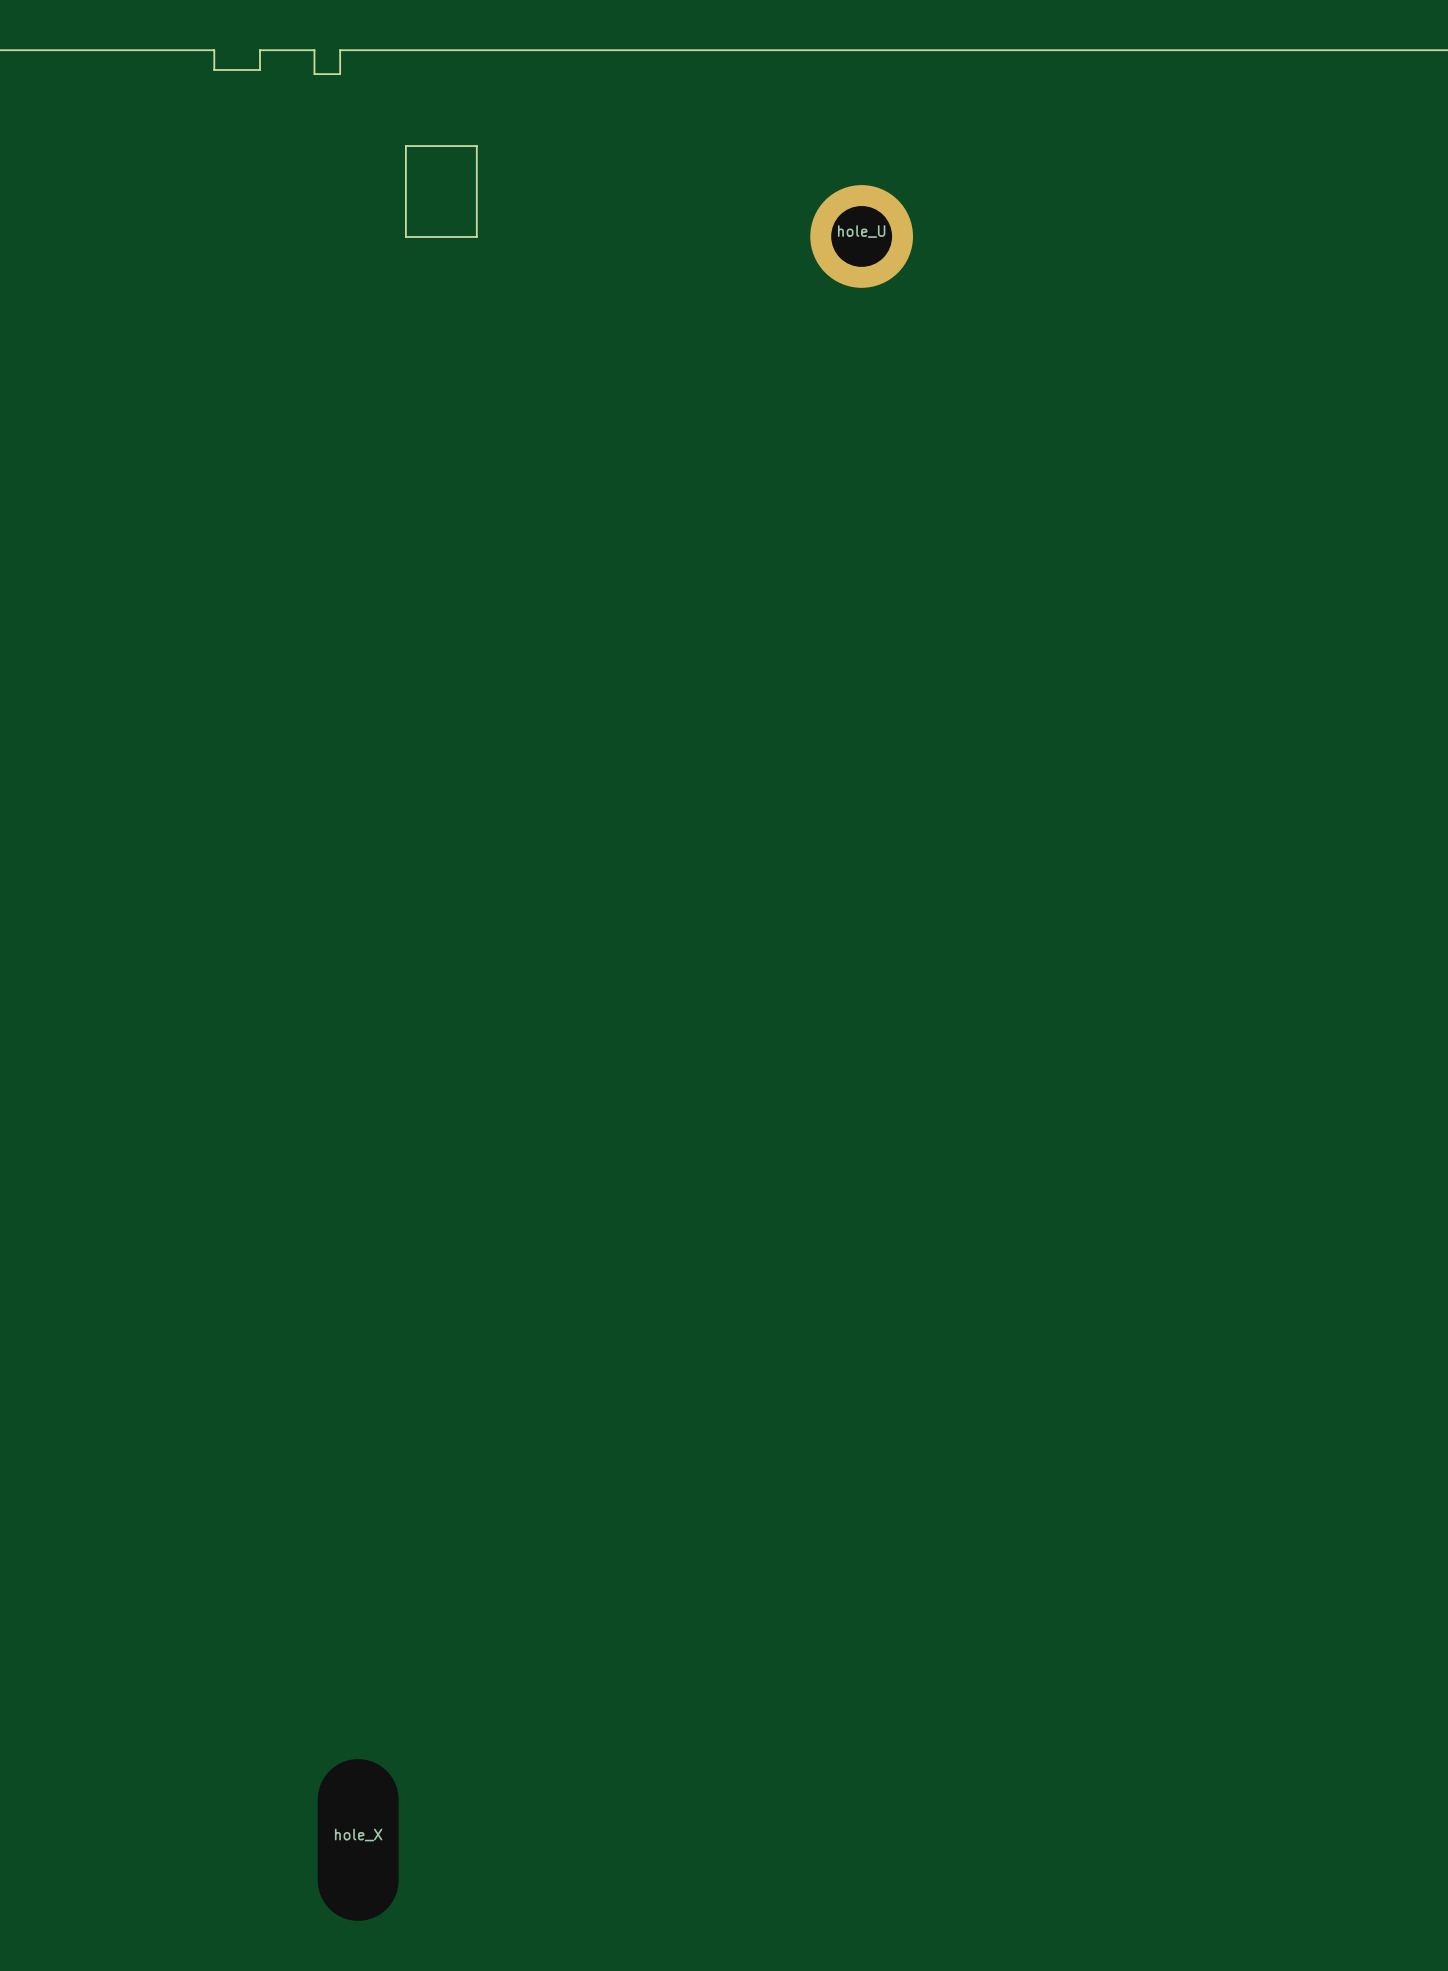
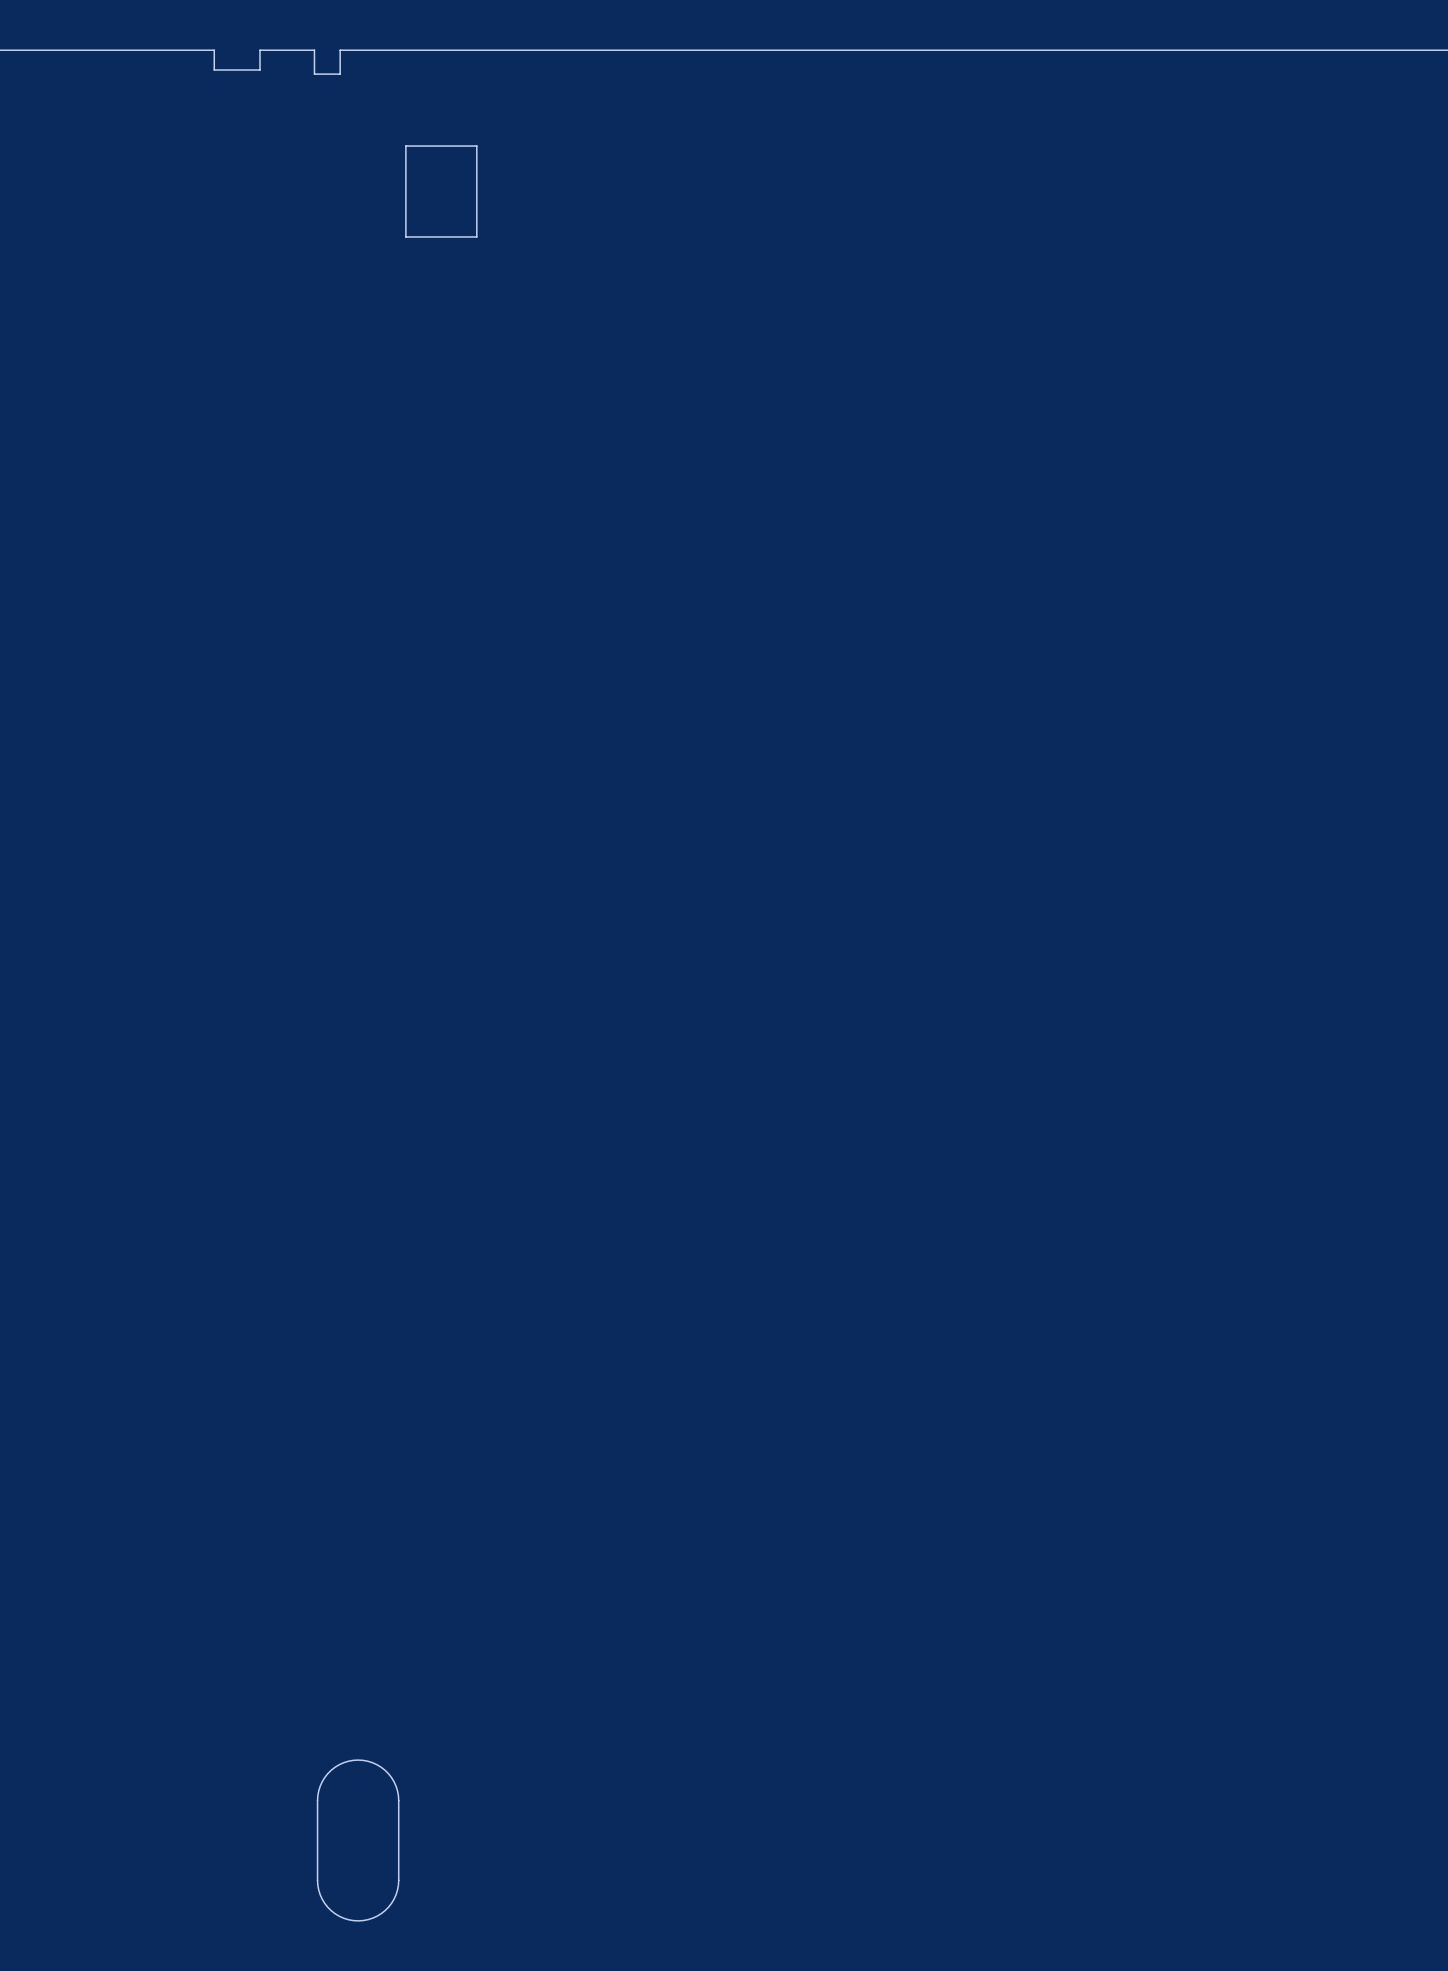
part: hole_U (861, 236) -> none
board edge: none -> (317, 1800) (317, 1880) (322, 1899) (331, 1910) (343, 1918) (363, 1920) (376, 1916) (391, 1903) (398, 1885) (398, 1800) (394, 1781) (385, 1770) (372, 1762) (358, 1760) (348, 1761) (335, 1767) (324, 1777) (320, 1786) (317, 1800)
part: hole_X (358, 1839) -> none

